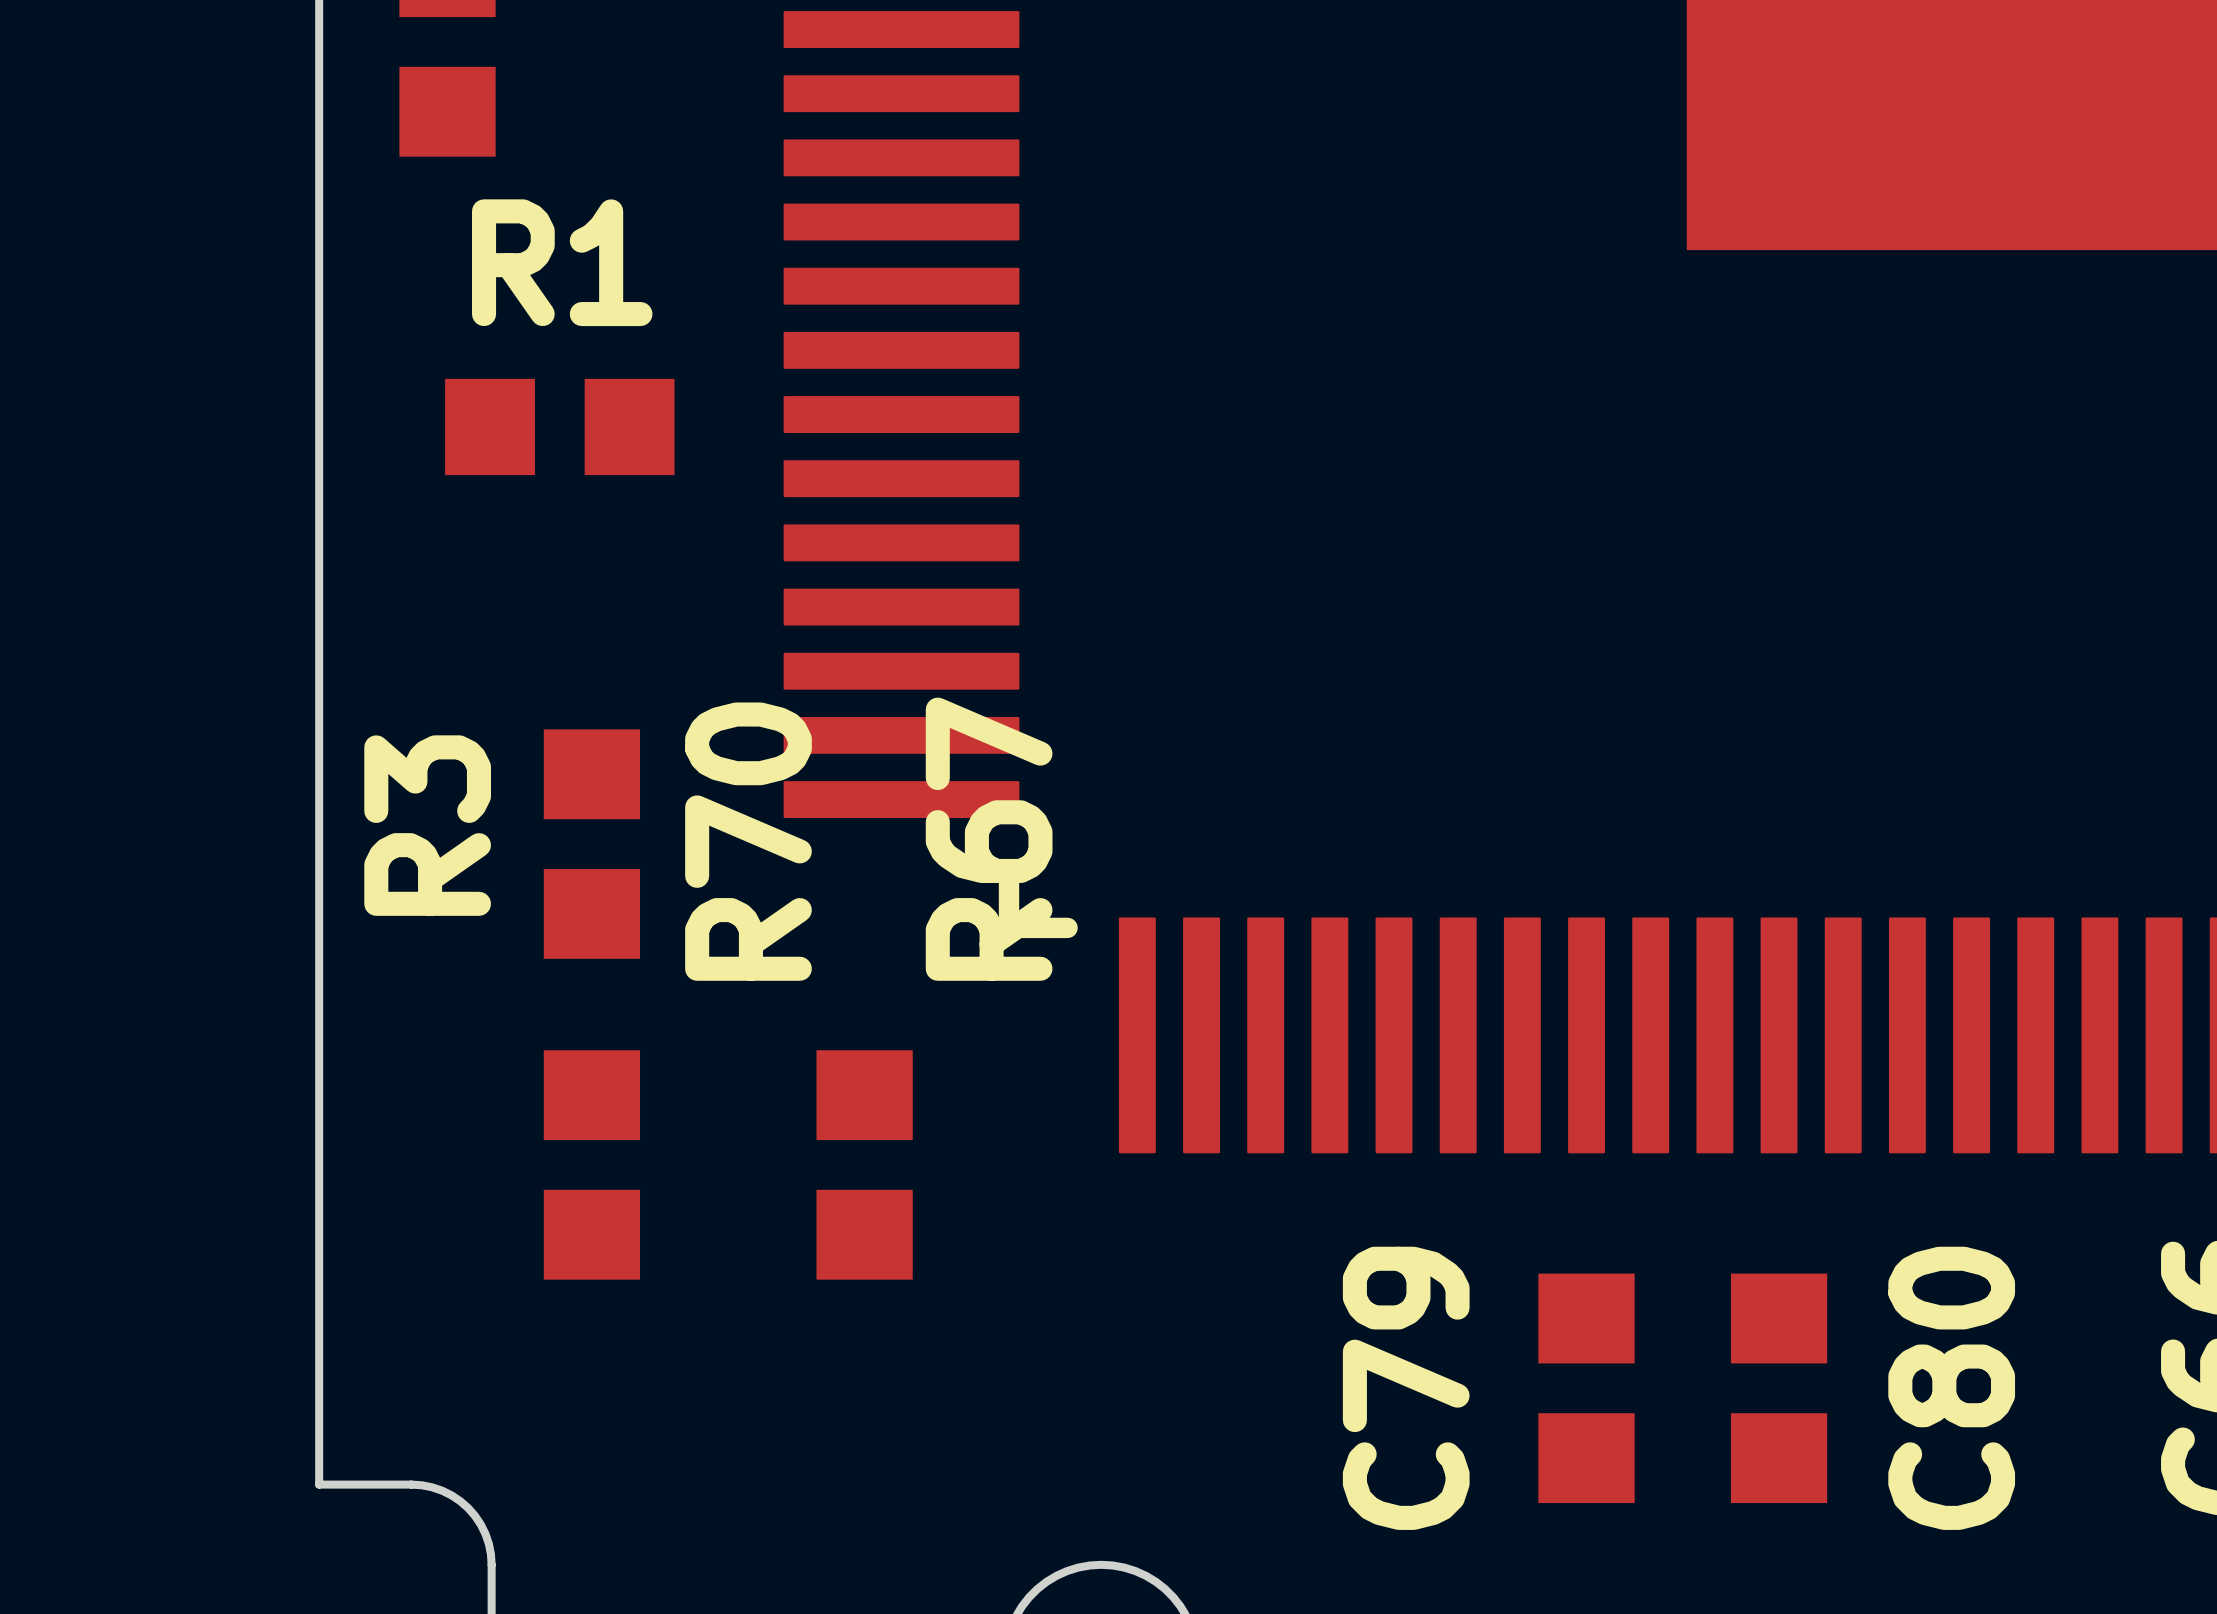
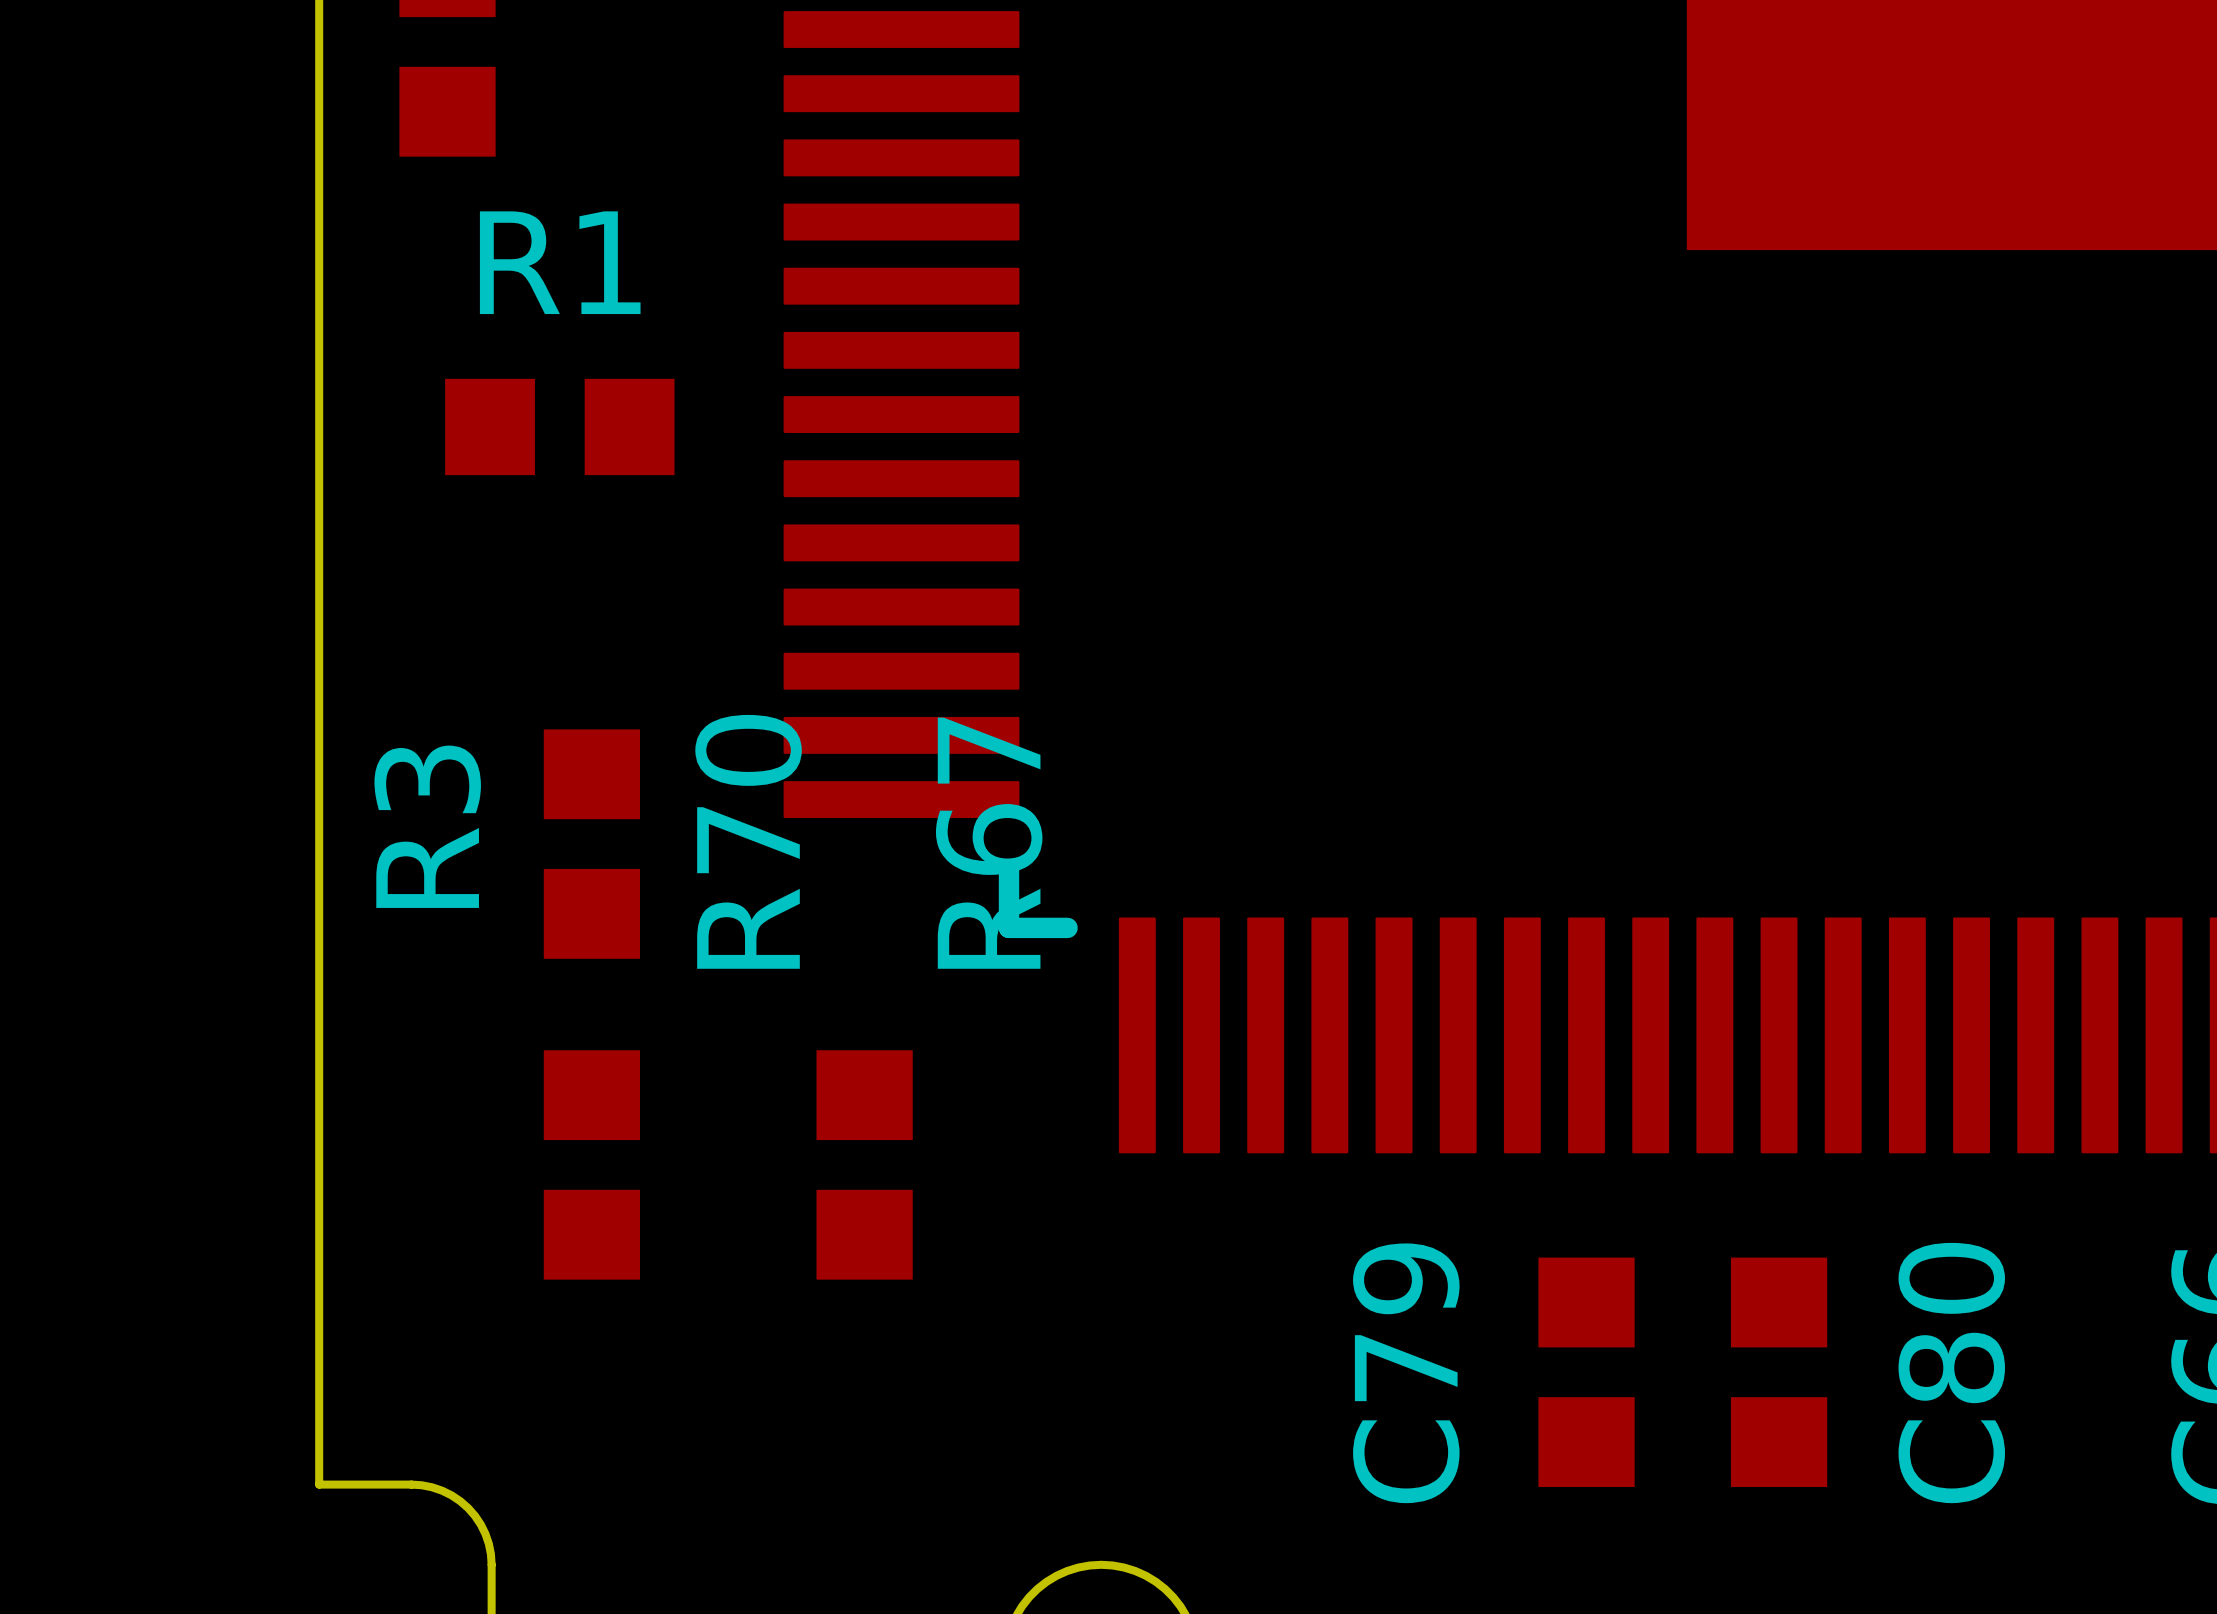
C79 position: (1586, 1388) -> (1586, 1372)
C80 position: (1779, 1388) -> (1779, 1372)

